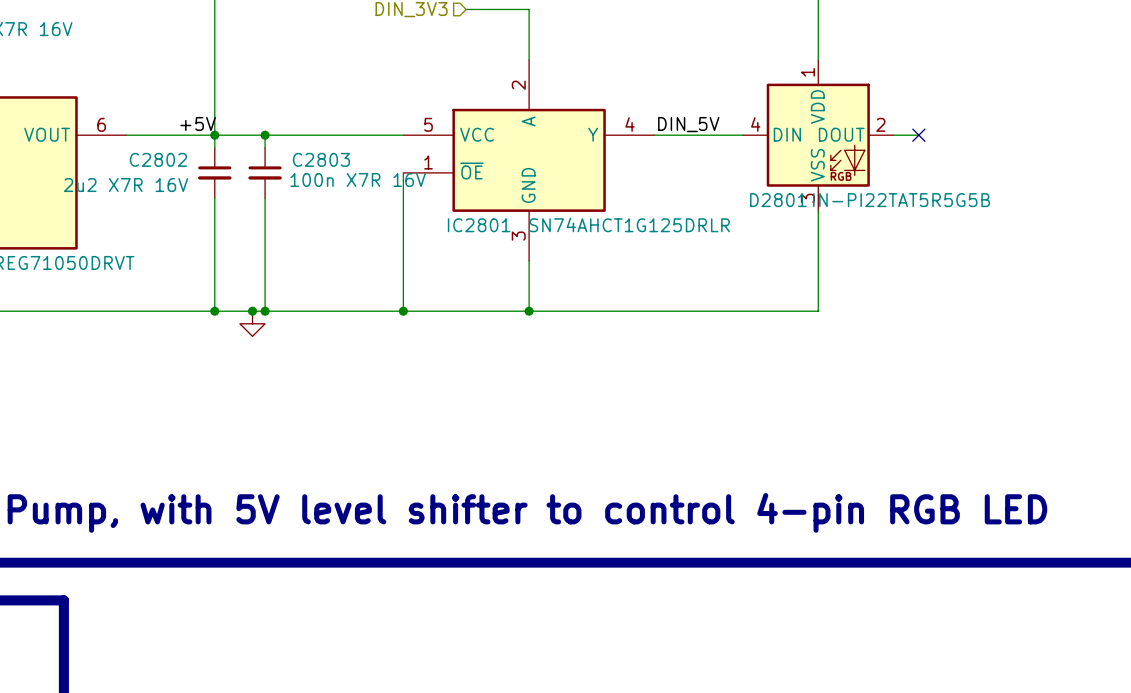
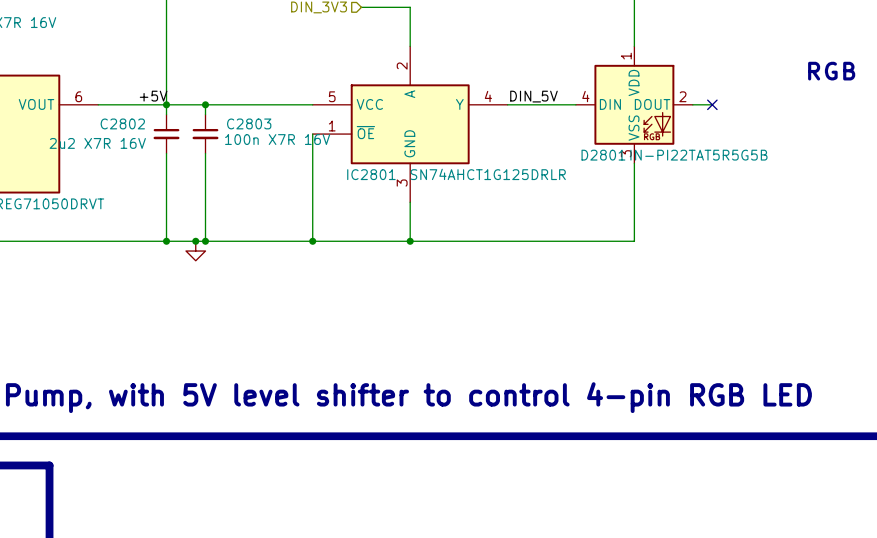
text: none -> R (814, 71)
text: none -> G (831, 71)
text: none -> B (849, 71)

